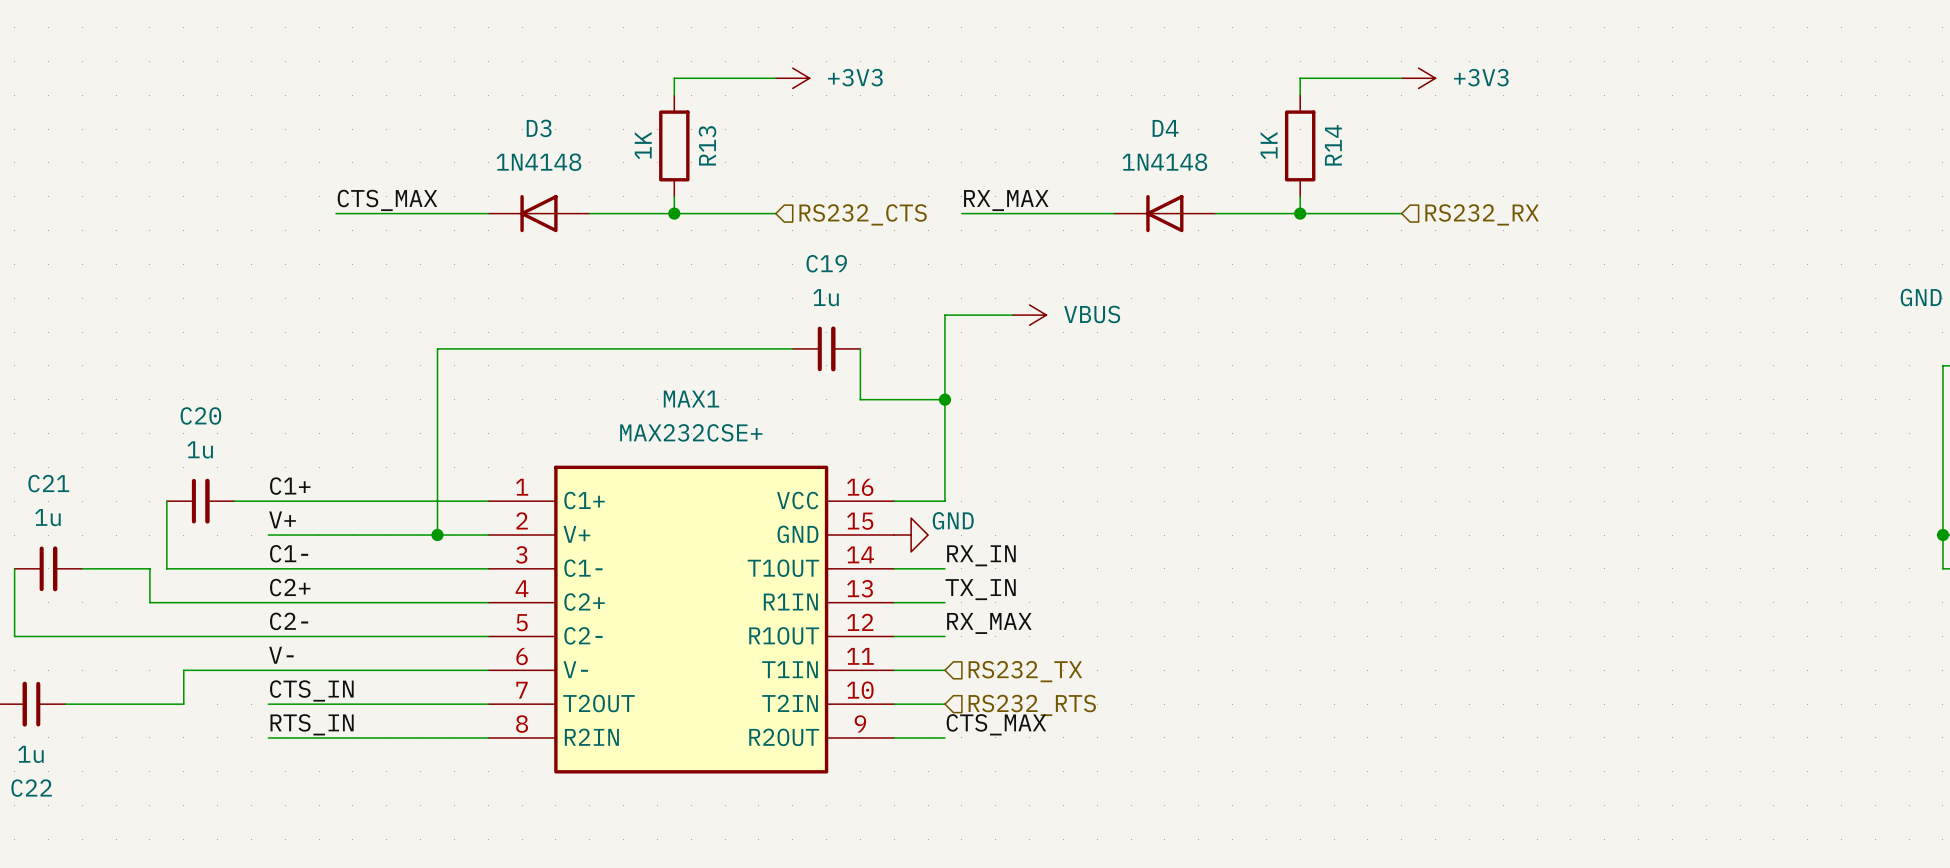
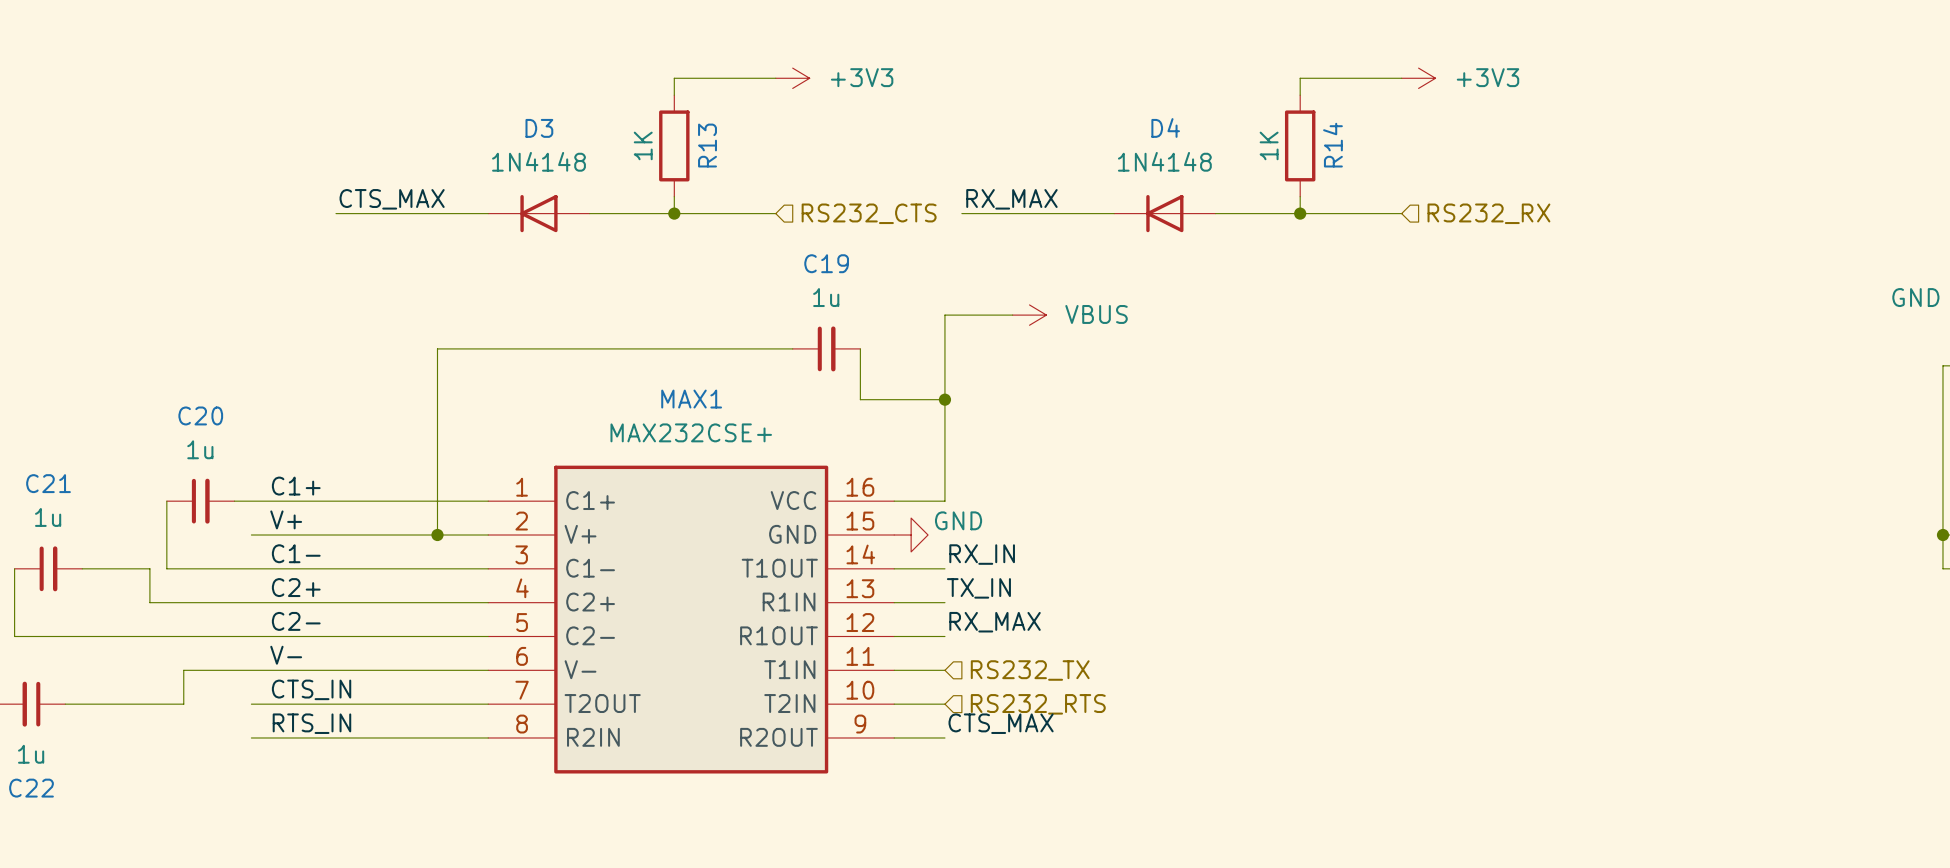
wire: none -> (251, 535) (268, 535)
wire: none -> (251, 704) (268, 704)
wire: none -> (251, 737) (268, 737)

